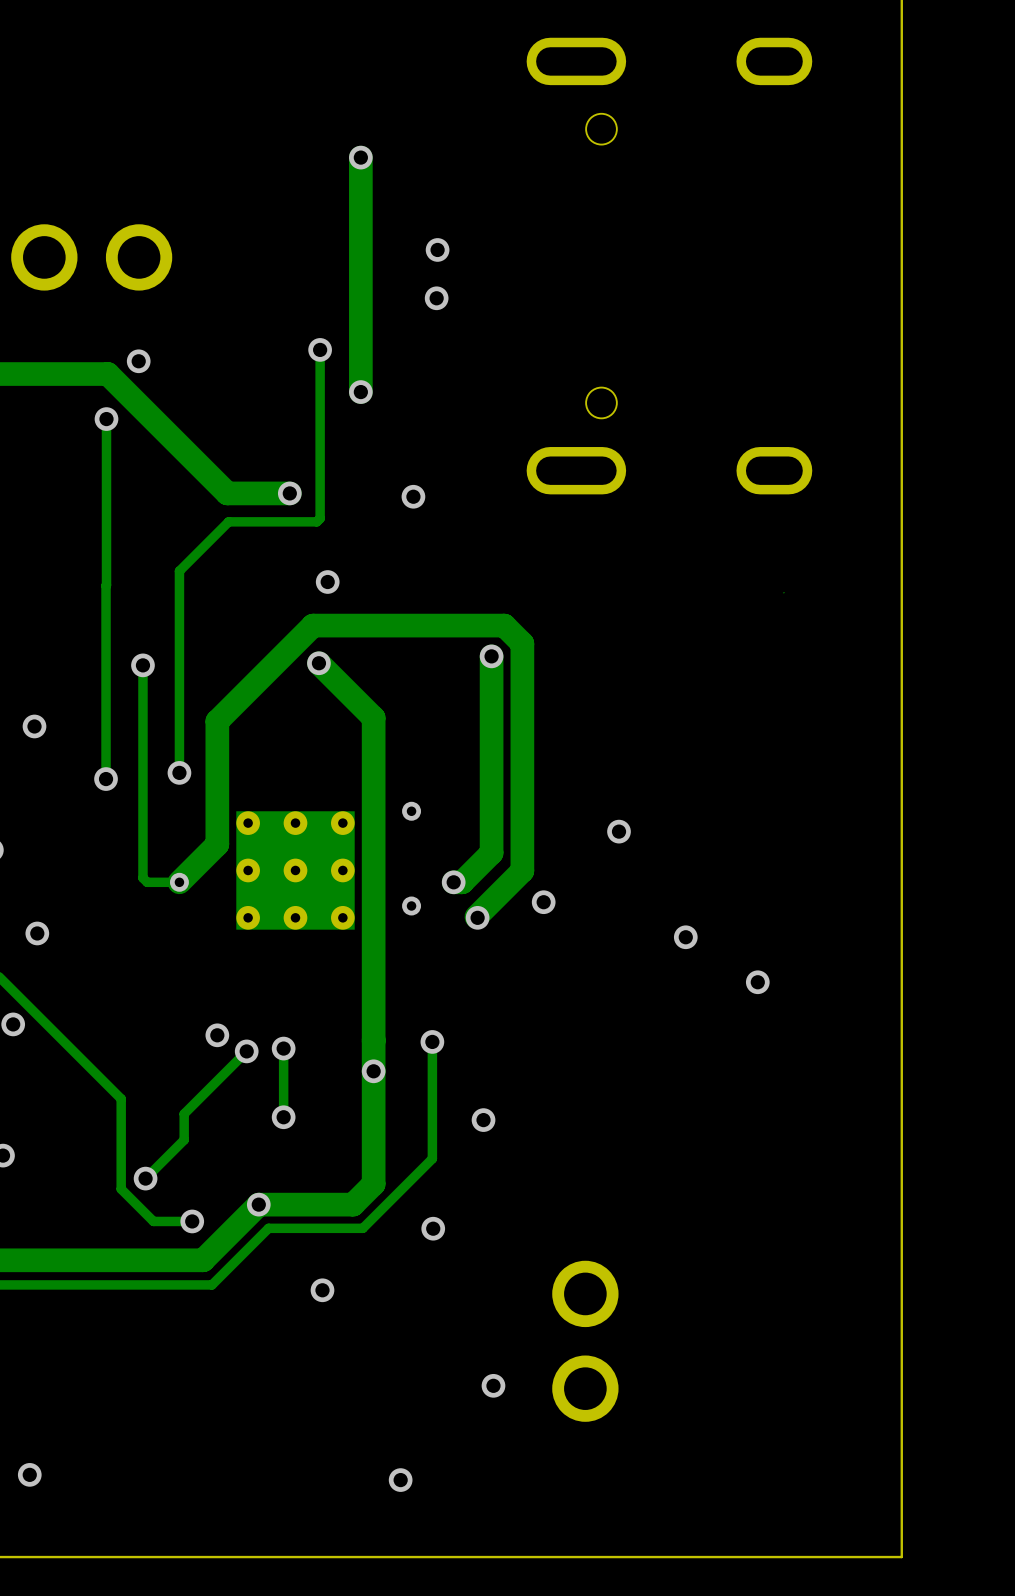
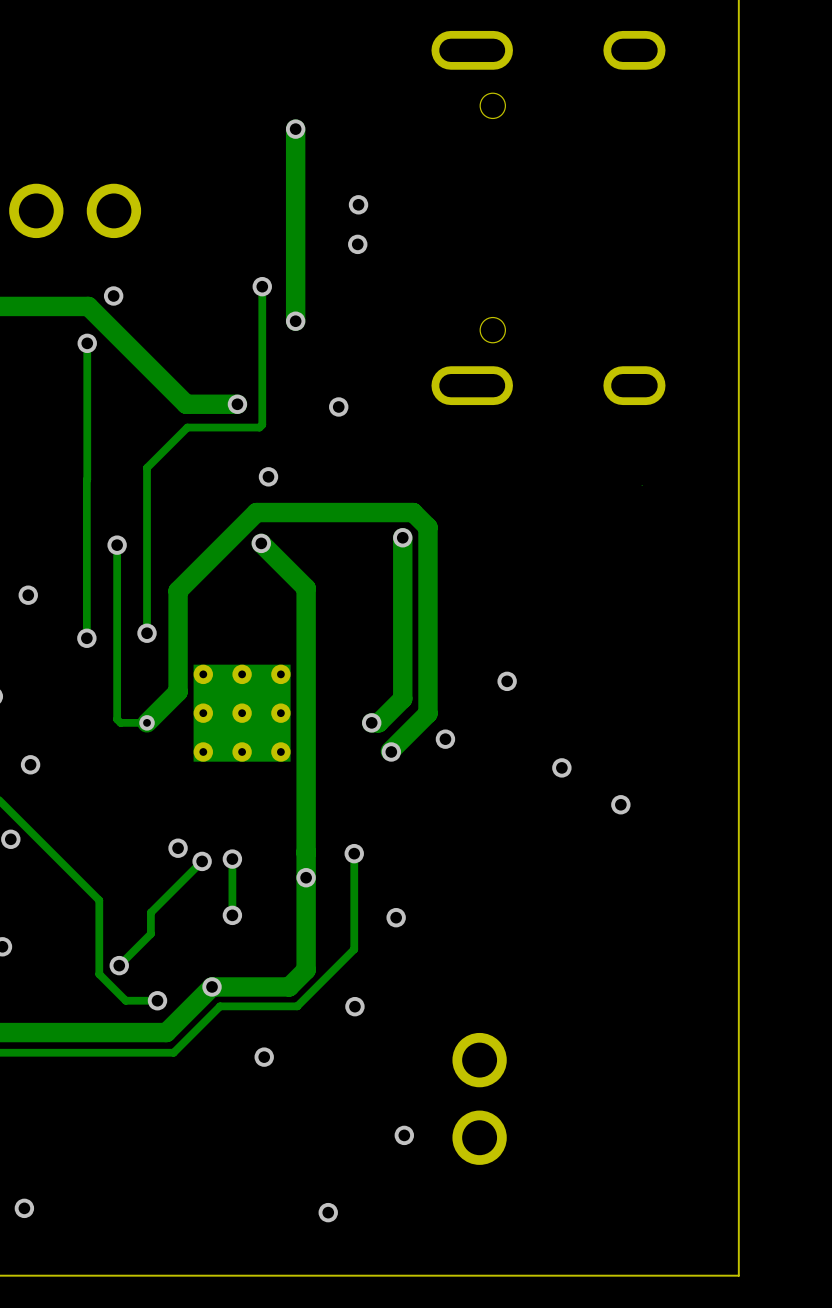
via: (411, 811) -> none
via: (411, 905) -> none

